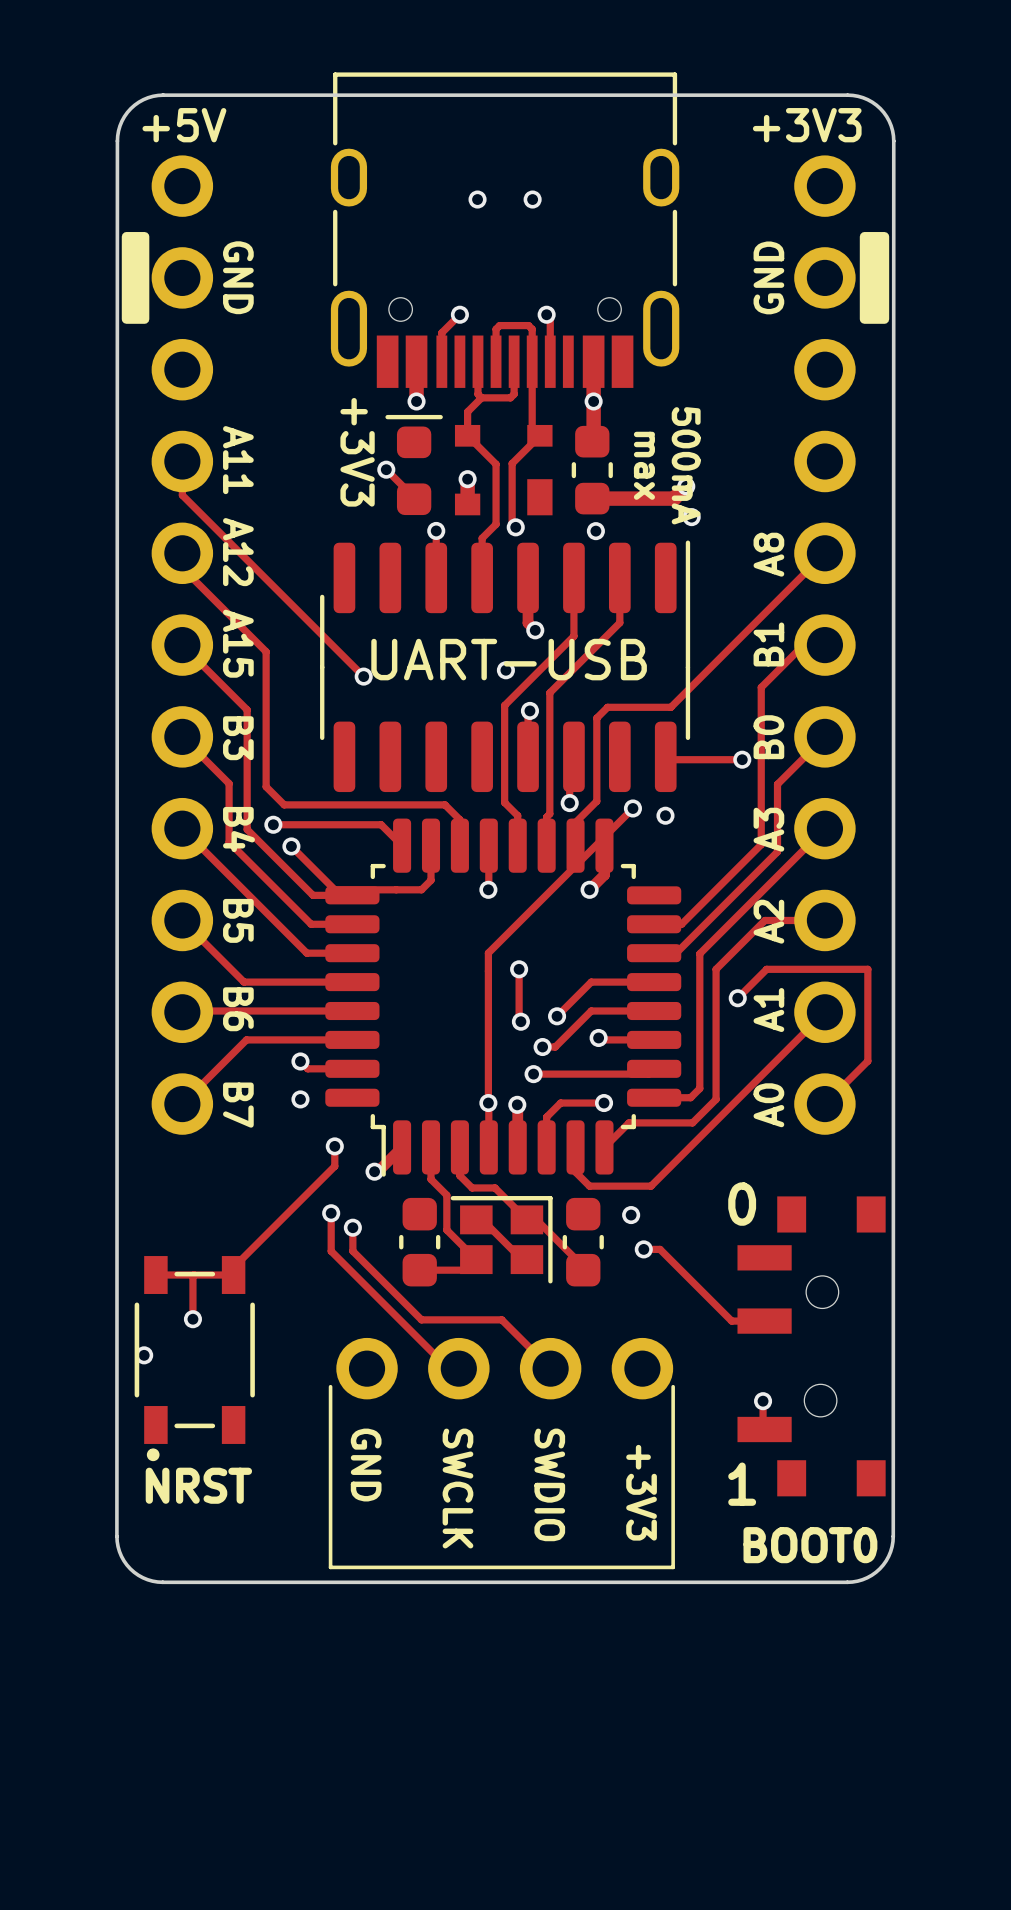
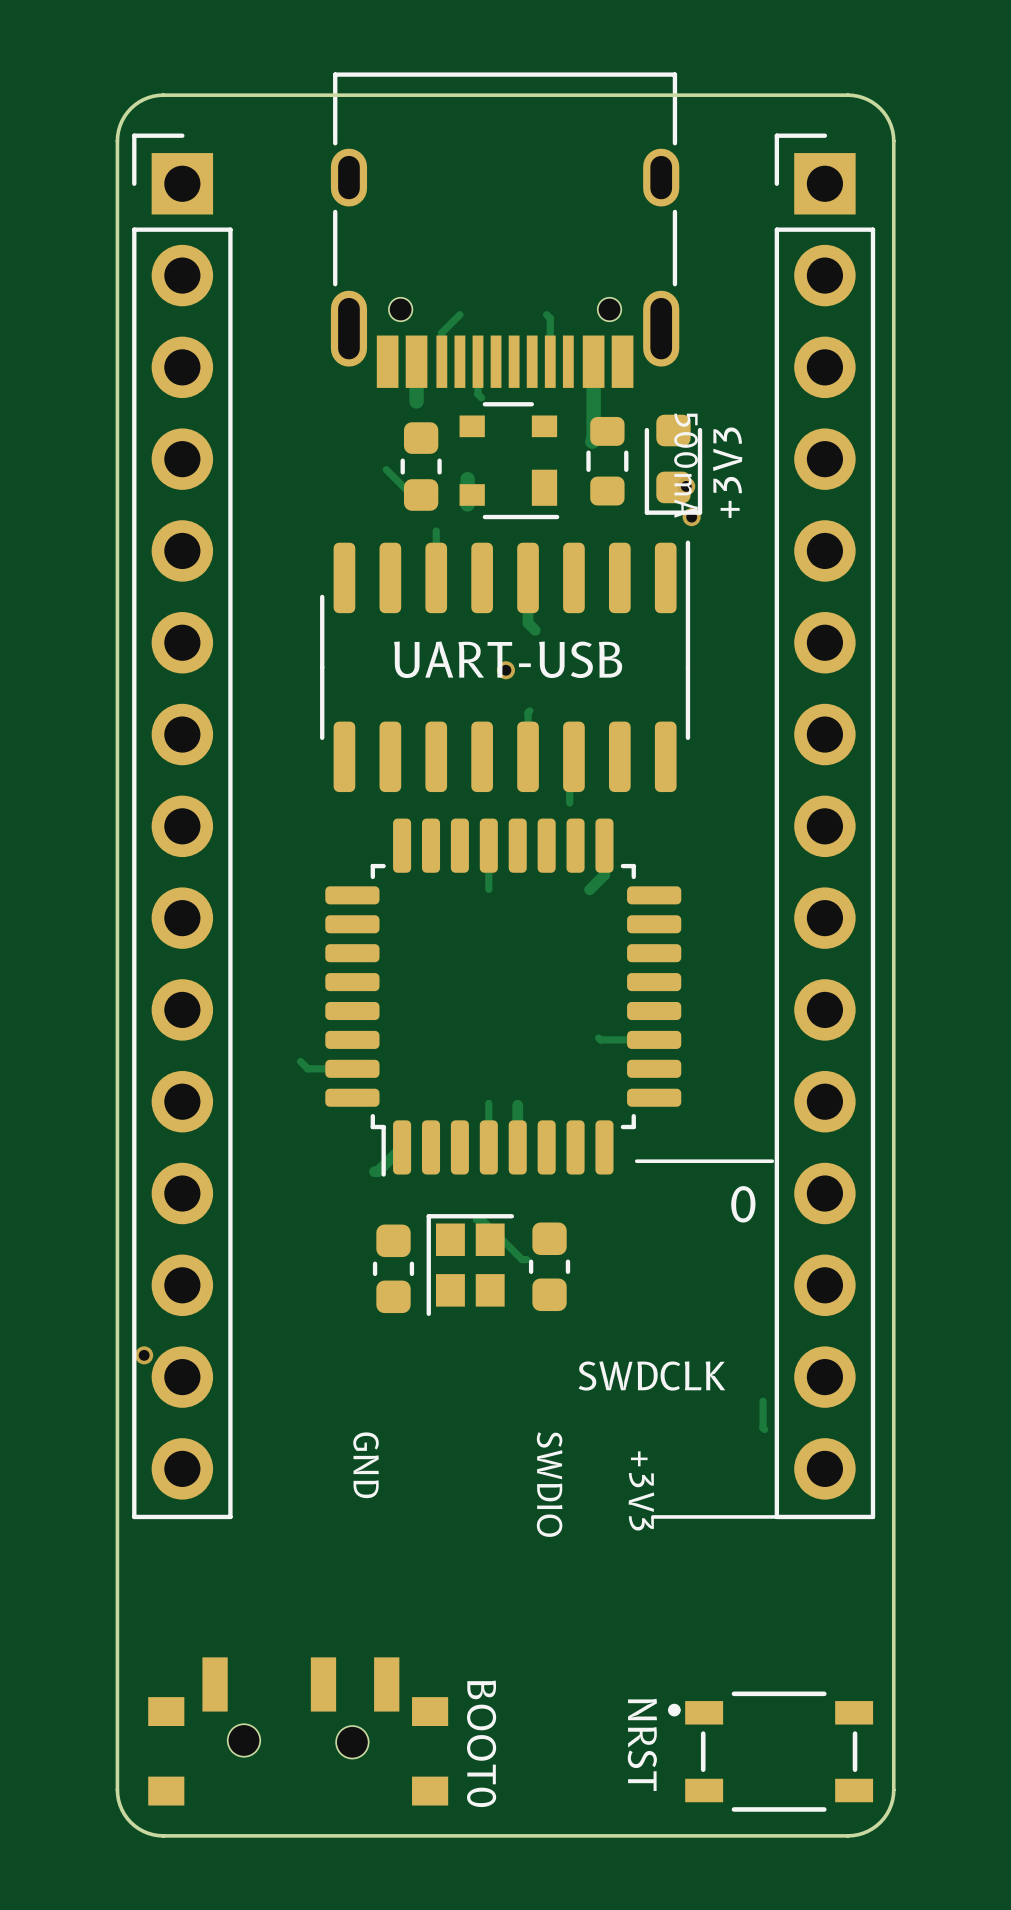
text: +5V (184, 125) -> none
text: +3V3 (807, 125) -> none
board edge: (117, 141) (116, 1536) (121, 1556) (126, 1565) (138, 1575) (152, 1581) (162, 1582) (847, 1582) (862, 1579) (879, 1568) (888, 1556) (893, 1536) (893, 141) -> (117, 141) (117, 1789) (121, 1809) (130, 1822) (138, 1828) (148, 1833) (163, 1835) (847, 1835) (863, 1833) (880, 1822) (891, 1805) (893, 1789) (893, 141)
via: (477, 199) -> none
via: (532, 199) -> none
drawing: [121, 232, 150, 324] -> none
drawing: [859, 232, 890, 324] -> none
text: GND (238, 277) -> none
text: GND (768, 277) -> none
via: (459, 314) -> none
via: (546, 314) -> none
track: (496, 361) (496, 329) (499, 325) (528, 325) (532, 329) (532, 428) (539, 435) (512, 463) (512, 523) (515, 527) -> none
track: (514, 361) (514, 394) (510, 397) (481, 397) (467, 411) (467, 435) (496, 464) (496, 524) (482, 538) (482, 577) -> none
via: (416, 401) -> none
via: (593, 401) -> none
part footprint: [385, 414, 443, 516] -> [400, 422, 442, 511]
part footprint: [454, 424, 553, 516] -> [459, 402, 560, 520]
part footprint: [571, 425, 613, 515] -> [586, 416, 629, 506]
text: +3V3 (357, 452) -> none
text: A11 (238, 460) -> none
track: (182, 461) (182, 495) (363, 676) -> none
part: none -> (673, 464)
text: max (644, 465) -> none
via: (386, 469) -> none
text: none -> +3V3 (727, 472)
via: (467, 479) -> none
track: (686, 486) (674, 498) (592, 498) -> none
via: (515, 527) -> none
via: (436, 530) -> none
via: (595, 531) -> none
text: A12 (238, 552) -> none
track: (182, 553) (182, 567) (266, 651) (266, 786) (284, 804) (445, 804) (459, 819) (459, 845) -> none
track: (824, 553) (670, 707) (607, 707) (596, 718) (596, 801) (575, 822) (575, 845) -> none
text: A8 (768, 554) -> none
track: (573, 577) (573, 636) (504, 705) (504, 802) (517, 815) (517, 845) -> none
track: (619, 577) (619, 622) (549, 692) (549, 813) (546, 817) (546, 845) -> none
via: (535, 630) -> none
text: A15 (238, 643) -> none
text: B1 (768, 644) -> none
track: (182, 645) (247, 709) (247, 829) (313, 895) (352, 895) -> none
part: (182, 645) -> none
track: (824, 645) (803, 645) (761, 687) (761, 844) (681, 924) (654, 924) -> none
part: (824, 645) -> none
via: (363, 676) -> none
via: (529, 710) -> none
track: (182, 736) (229, 783) (229, 842) (311, 924) (352, 924) -> none
track: (824, 736) (777, 784) (777, 851) (676, 953) (654, 953) -> none
text: B0 (768, 737) -> none
text: B3 (238, 738) -> none
track: (665, 756) (668, 759) (742, 759) -> none
via: (742, 759) -> none
via: (569, 803) -> none
track: (632, 808) (488, 953) (488, 1103) -> none
via: (632, 808) -> none
via: (665, 815) -> none
track: (273, 824) (381, 824) (402, 845) -> none
via: (273, 824) -> none
part: none -> (182, 826)
part: none -> (824, 826)
track: (182, 828) (306, 953) (352, 953) -> none
track: (824, 828) (699, 953) (699, 1088) (690, 1097) (654, 1097) -> none
text: B4 (238, 829) -> none
text: A3 (768, 829) -> none
track: (431, 845) (431, 880) (421, 889) (334, 889) (291, 846) -> none
via: (291, 846) -> none
via: (488, 889) -> none
via: (589, 889) -> none
track: (182, 920) (243, 982) (352, 982) -> none
text: B5 (238, 920) -> none
track: (824, 920) (764, 920) (716, 969) (716, 1099) (692, 1122) (628, 1122) (604, 1147) -> none
text: A2 (768, 921) -> none
track: (519, 969) (519, 1019) (520, 1021) -> none
via: (519, 969) -> none
track: (654, 982) (591, 982) (557, 1016) -> none
track: (737, 998) (766, 969) (867, 969) (867, 1061) (824, 1104) -> none
via: (737, 998) -> none
text: B6 (238, 1009) -> none
text: A1 (768, 1010) -> none
track: (352, 1011) (182, 1012) -> none
track: (654, 1011) (591, 1011) (555, 1047) (542, 1047) -> none
track: (824, 1012) (651, 1186) (589, 1186) (575, 1172) (575, 1147) -> none
via: (557, 1016) -> none
via: (520, 1021) -> none
via: (598, 1037) -> none
track: (352, 1039) (246, 1039) (182, 1104) -> none
via: (542, 1047) -> none
via: (300, 1061) -> none
track: (654, 1068) (648, 1074) (533, 1074) -> none
via: (533, 1074) -> none
via: (300, 1099) -> none
via: (488, 1103) -> none
track: (604, 1103) (560, 1103) (546, 1117) (546, 1147) -> none
via: (604, 1103) -> none
via: (517, 1104) -> none
text: B7 (238, 1105) -> none
text: A0 (768, 1105) -> none
track: (334, 1146) (334, 1166) (233, 1267) (233, 1275) (155, 1275) -> none
via: (334, 1146) -> none
track: (431, 1147) (431, 1179) (446, 1195) (446, 1230) (476, 1259) (465, 1270) (419, 1270) -> none
track: (459, 1147) (459, 1175) (472, 1187) (495, 1187) (526, 1219) (536, 1219) (583, 1266) (583, 1270) -> none
line: none -> (636, 1161) (772, 1161)
via: (374, 1171) -> none
track: (331, 1213) (331, 1251) (448, 1368) (458, 1368) -> none
via: (331, 1213) -> none
via: (631, 1215) -> none
track: (352, 1227) (352, 1251) (421, 1319) (501, 1319) (550, 1368) -> none
via: (352, 1227) -> none
part rotation: 0° (501, 1239) -> 90° counterclockwise (470, 1265)
part position: (419, 1242) -> (393, 1268)
part position: (583, 1242) -> (549, 1266)
track: (643, 1249) (660, 1249) (731, 1321) (764, 1321) -> none
via: (643, 1249) -> none
track: (193, 1275) (192, 1319) -> none
via: (192, 1319) -> none
part rotation: 0° (811, 1346) -> 90° clockwise (298, 1731)
part position: (811, 1346) -> (298, 1731)
part rotation: 0° (194, 1358) -> 90° clockwise (770, 1751)
part position: (194, 1358) -> (770, 1751)
part: (504, 1368) -> none
text: none -> SWDCLK (651, 1375)
line: (330, 1386) (330, 1567) (673, 1567) (673, 1386) -> none
via: (763, 1401) -> none
text: 1 (742, 1484) -> none
text rotation: 0° (198, 1485) -> 90° clockwise (642, 1744)
text position: NRST (198, 1485) -> NRST (642, 1744)
text: SWCLK (457, 1488) -> none
line: none -> (652, 1516) (776, 1516)
text rotation: 0° (810, 1545) -> 90° clockwise (481, 1743)
text position: BOOT0 (810, 1545) -> BOOT0 (481, 1743)

